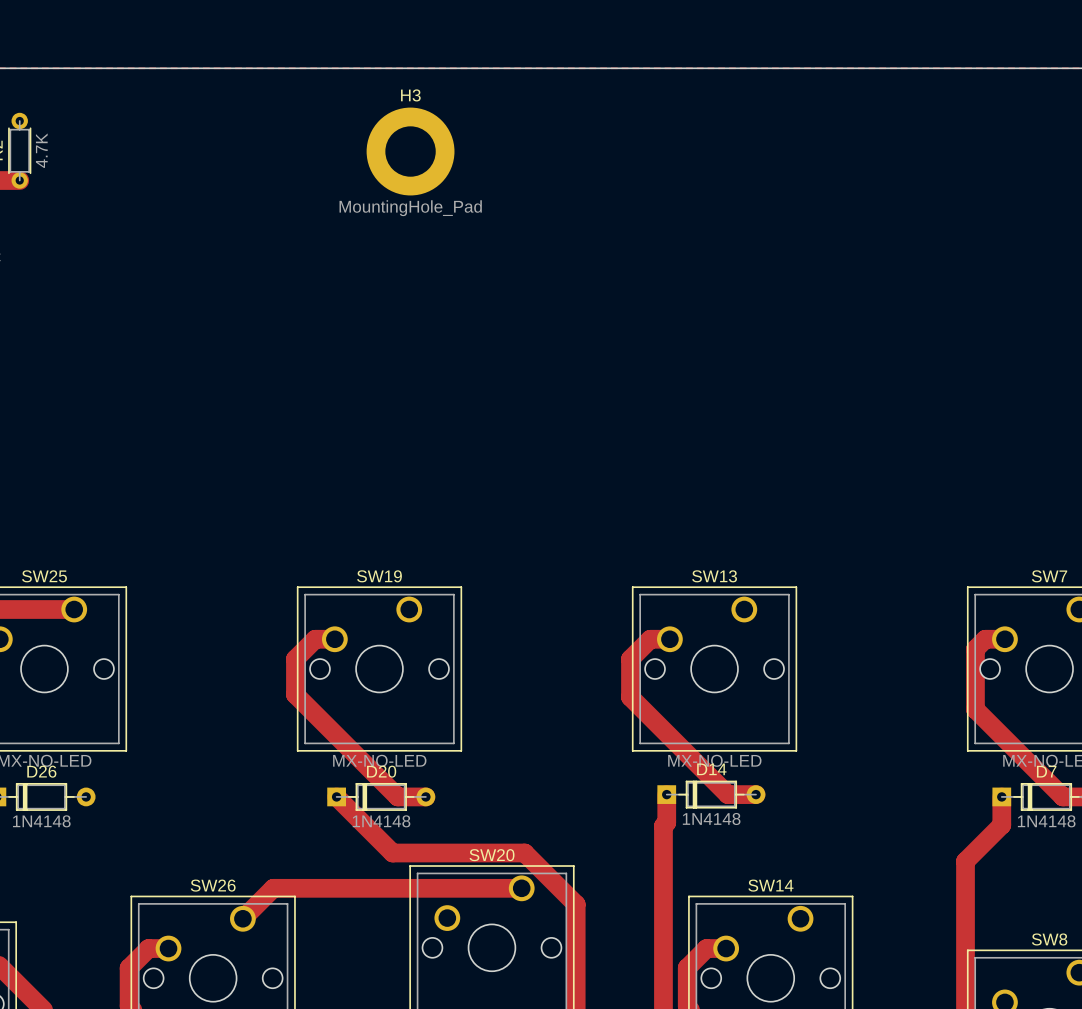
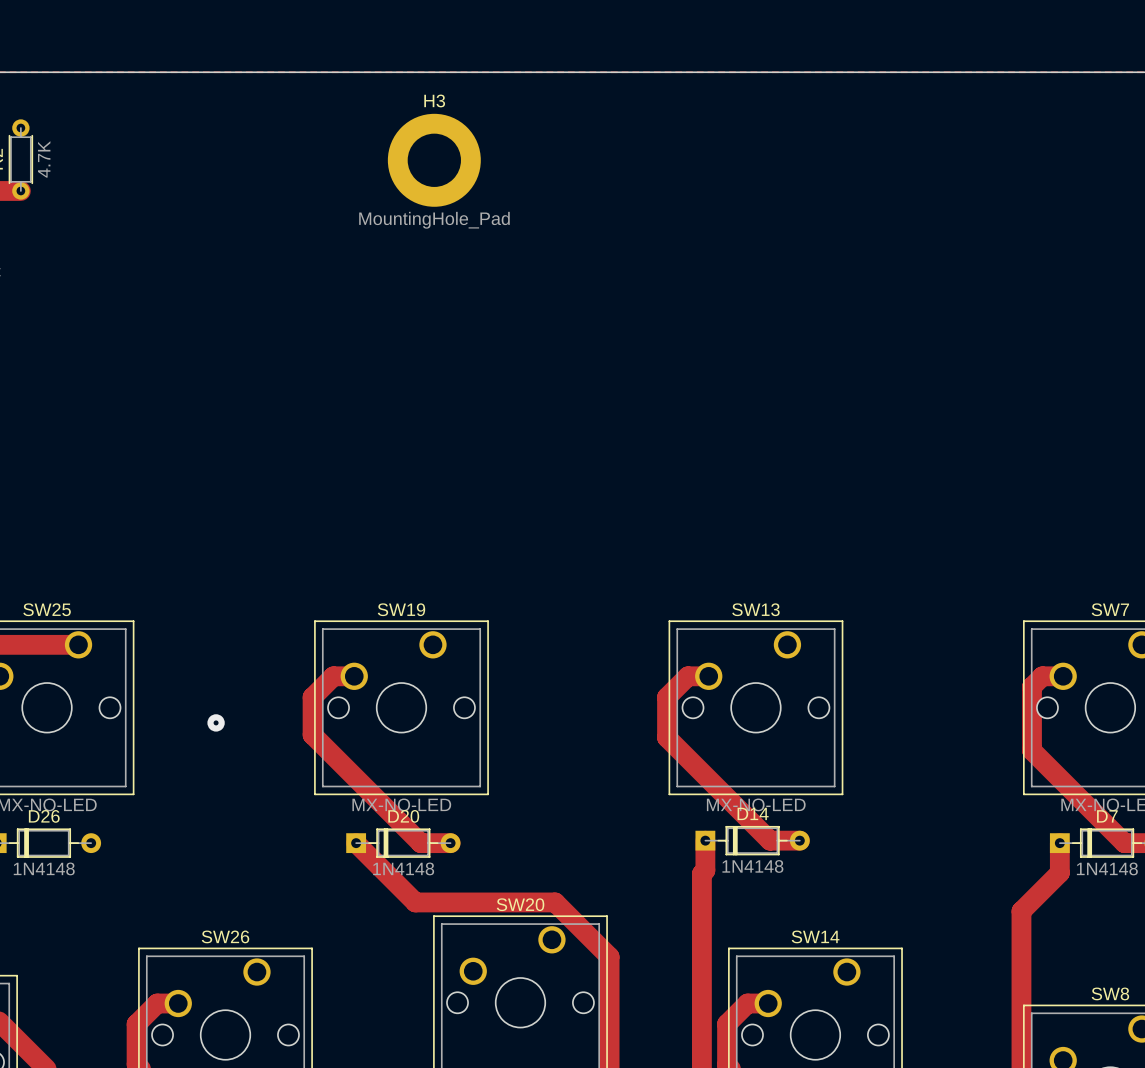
via: none -> (216, 722)
track: (521, 888) (273, 888) (242, 918) -> none

